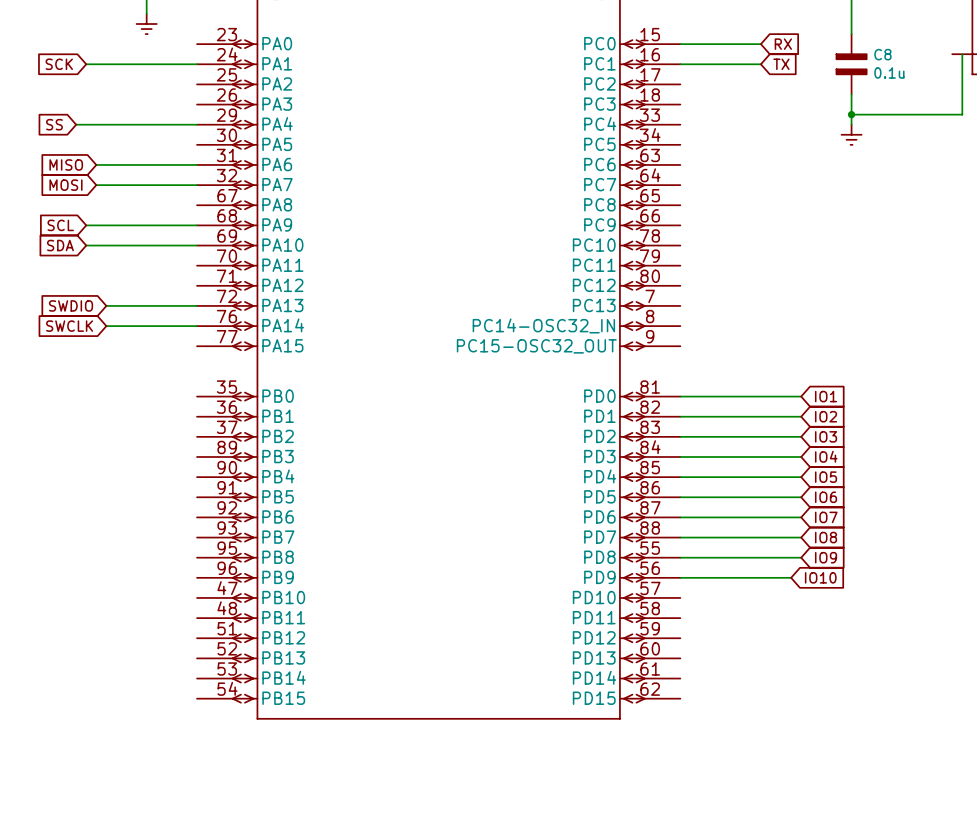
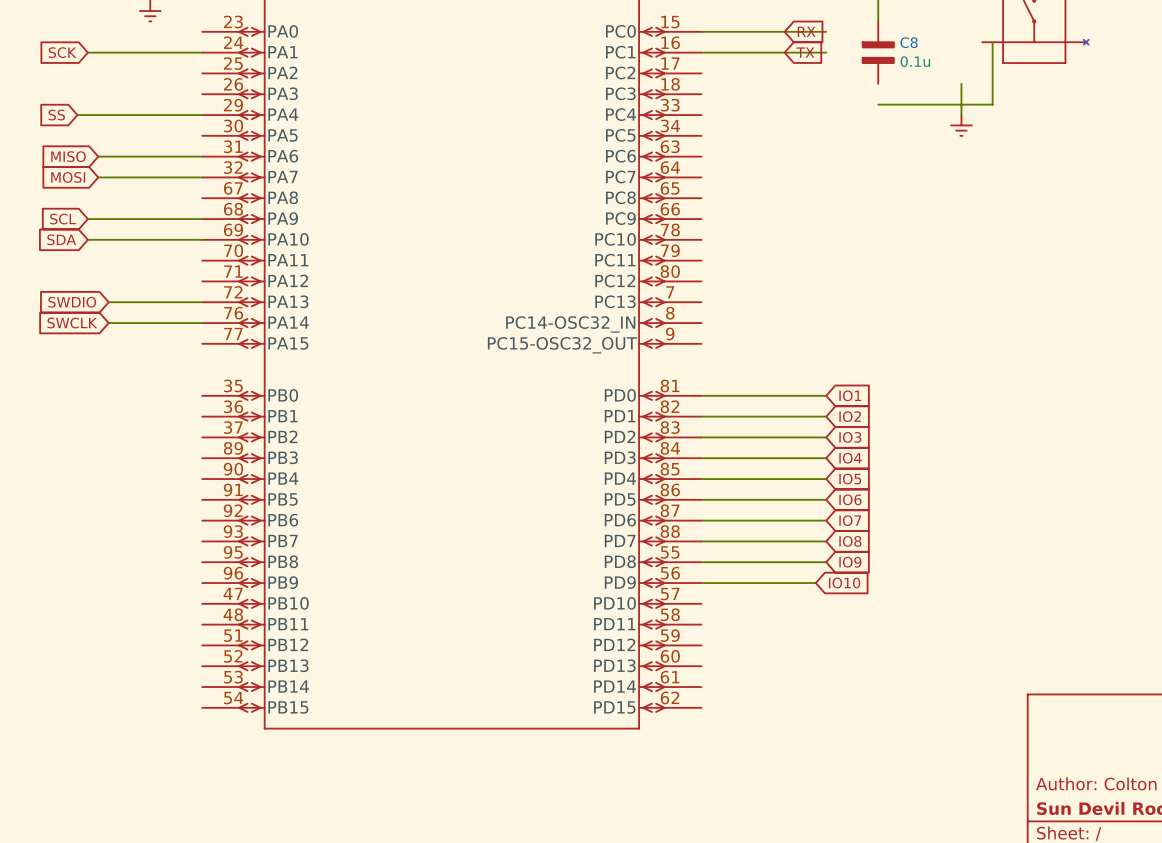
wire: none -> (784, 31) (826, 31)
wire: none -> (784, 52) (826, 52)
wire: (851, 94) (851, 124) -> (961, 83) (961, 115)
junction: (851, 114) -> none
power symbol position: (851, 134) -> (961, 125)

